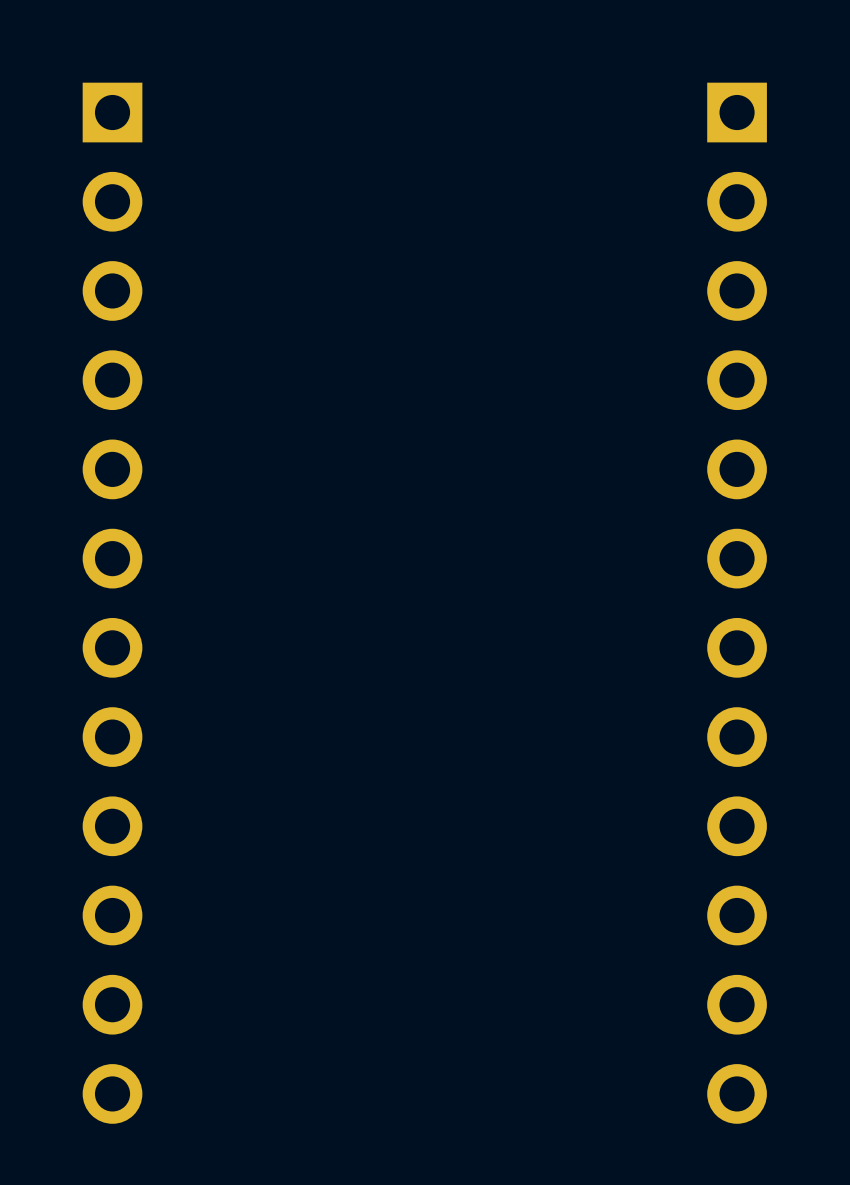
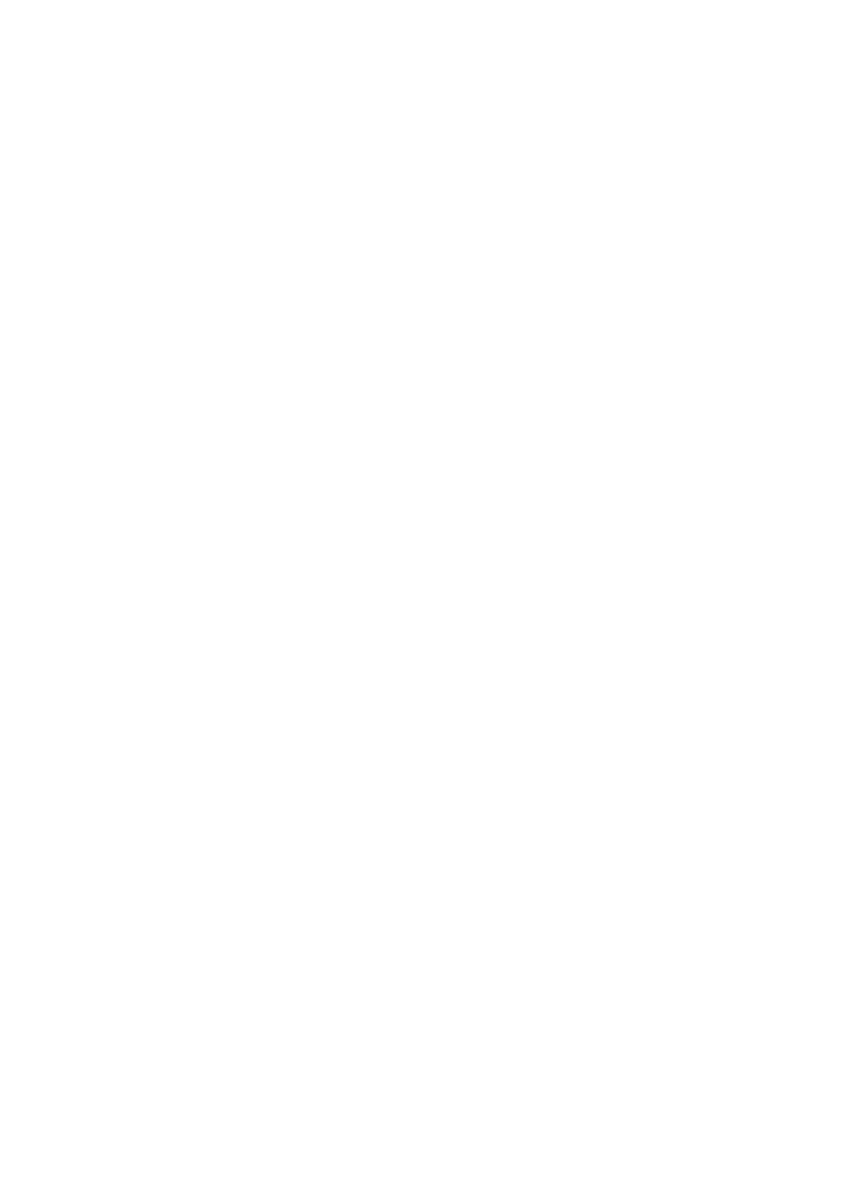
part: (112, 603) -> none
part: (737, 603) -> none

